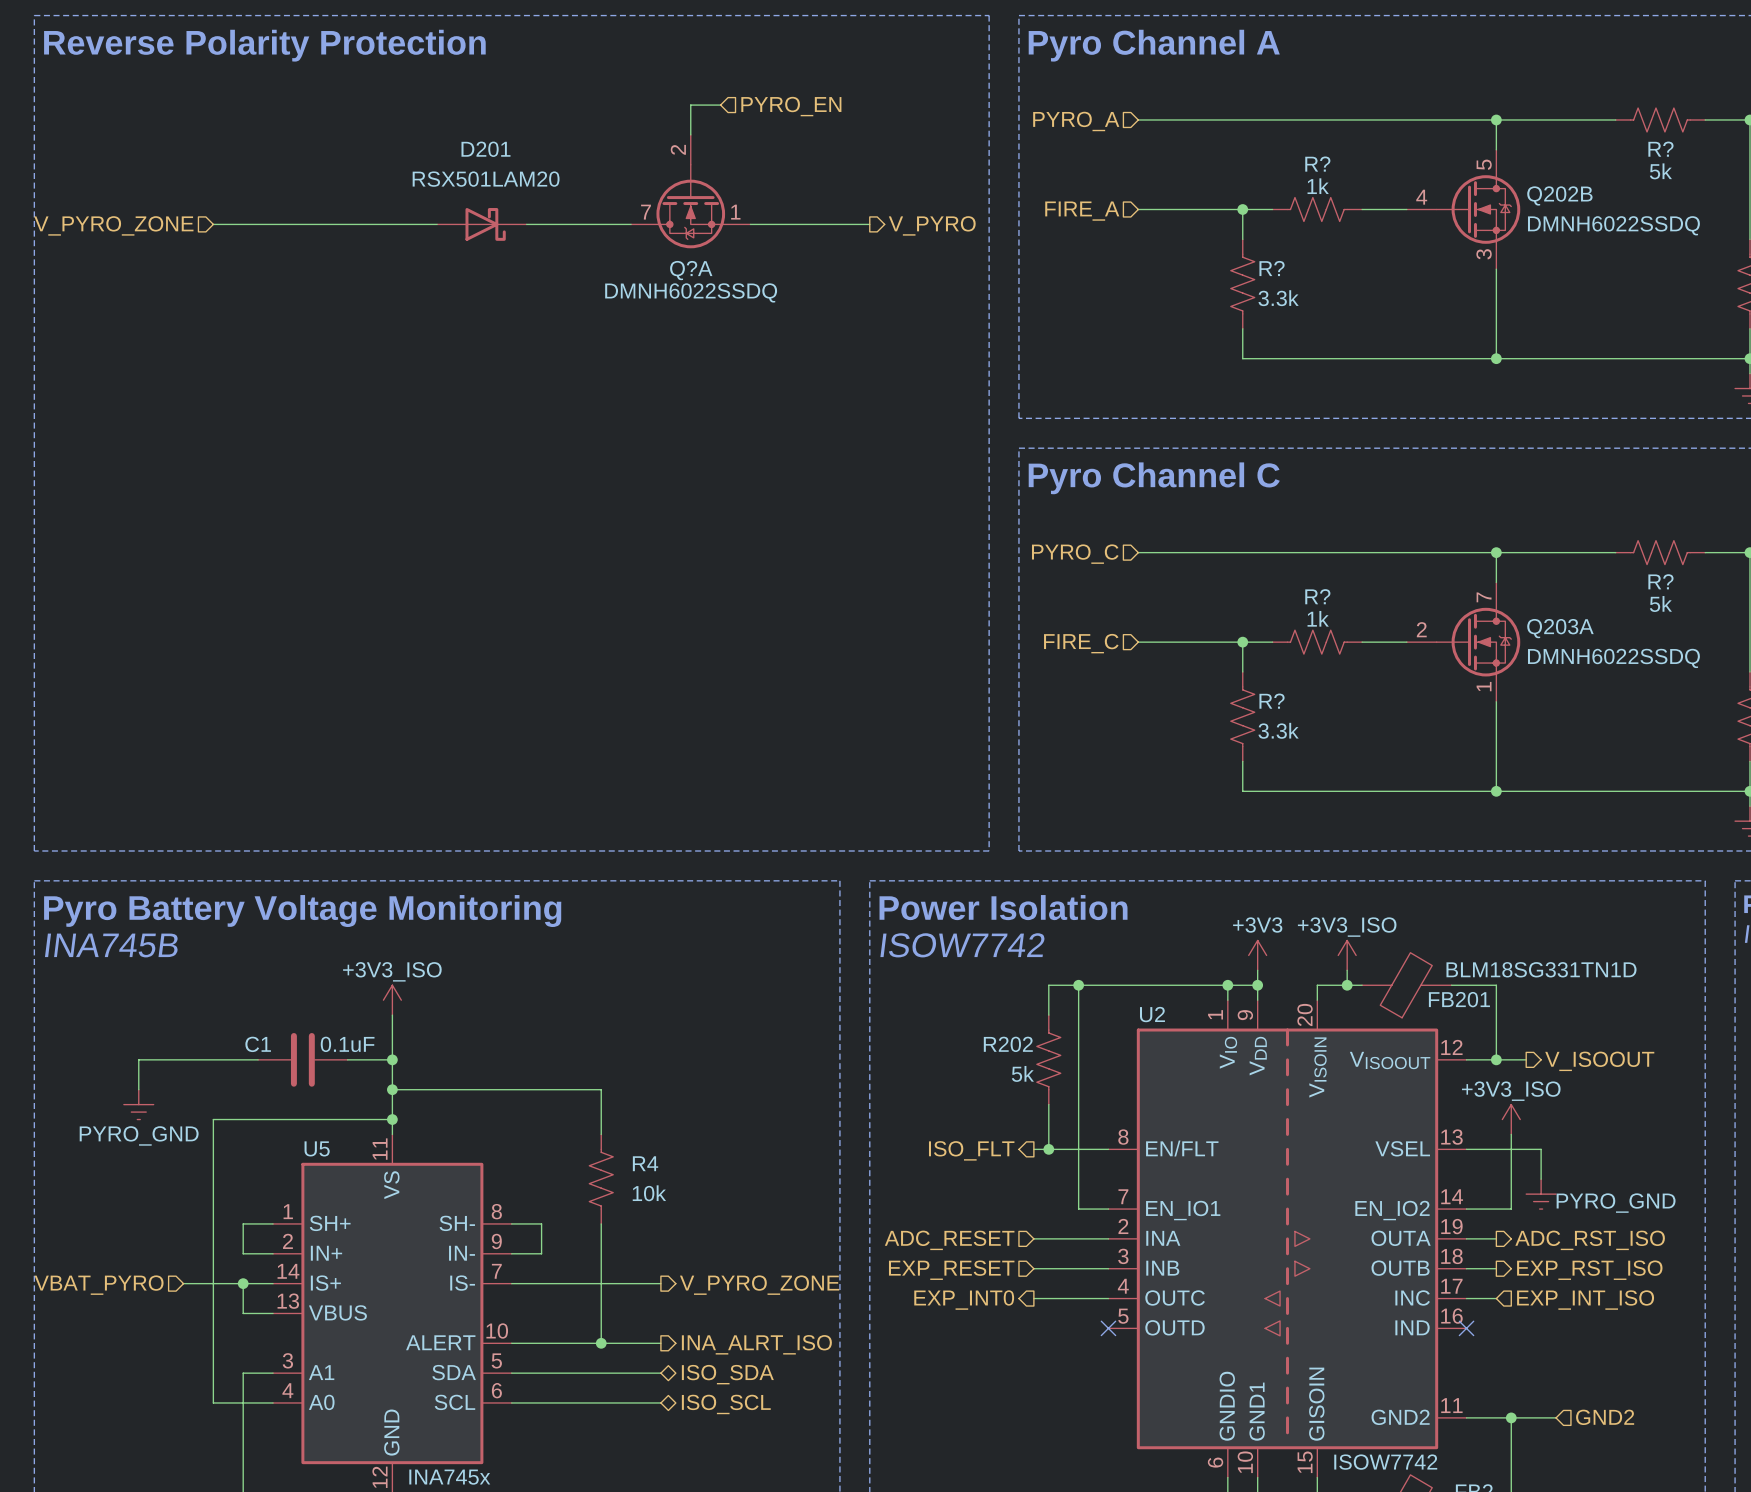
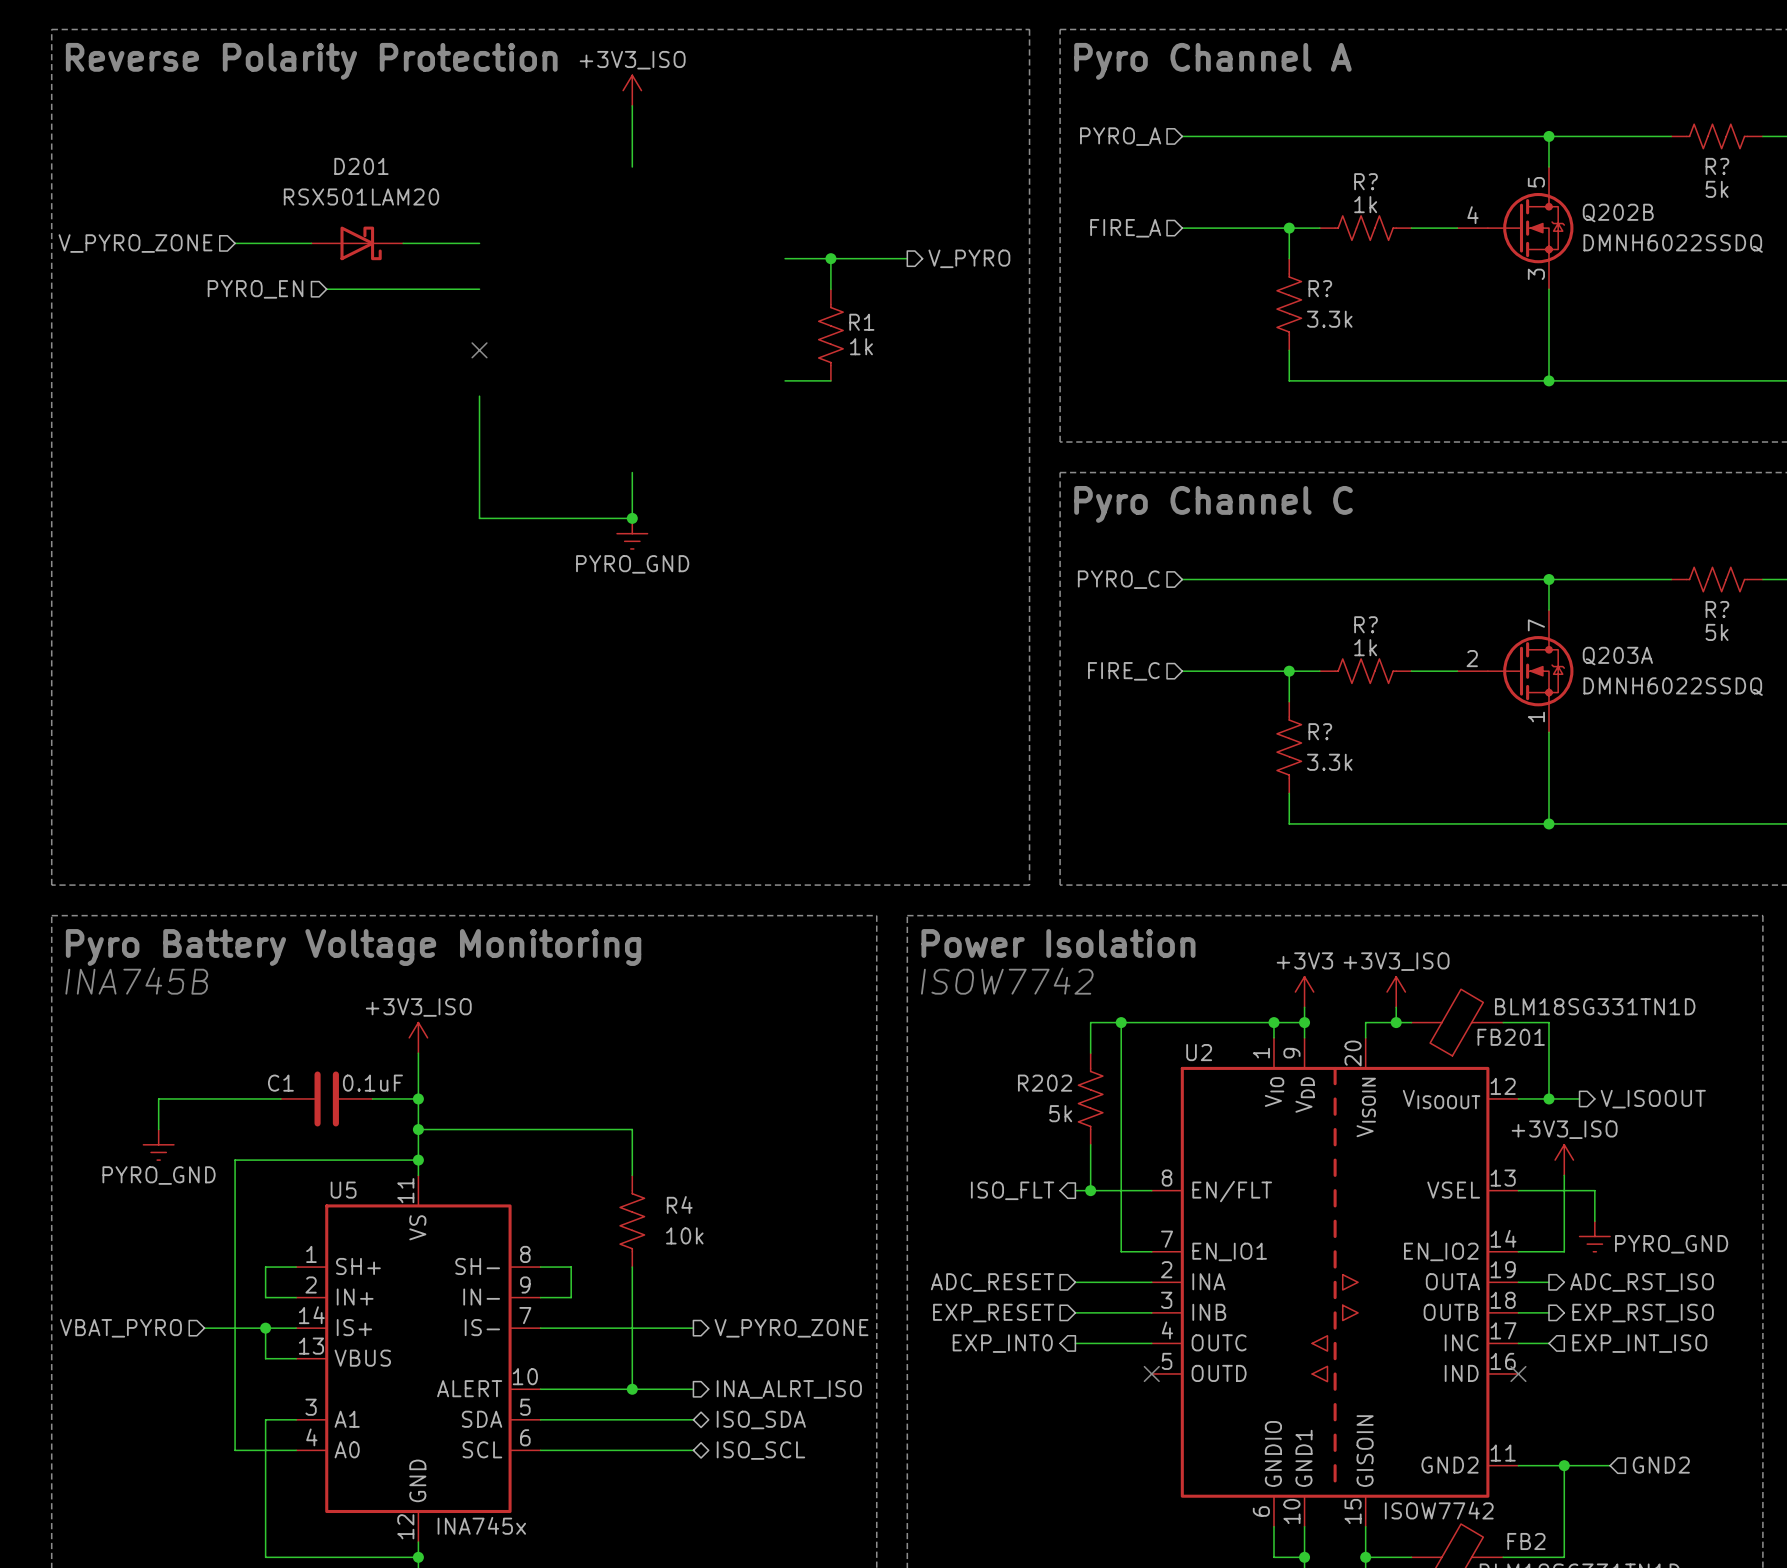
power symbol: none -> +3V3_ISO (632, 90)
wire: none -> (632, 105) (632, 167)
wire: (720, 105) (690, 105) (690, 134) -> none
hierarchical label: PYRO_EN (791, 106) -> none
Q?A: DMNH6022SSDQ (690, 191) -> none
D201 position: (481, 224) -> (357, 243)
wire: (526, 224) (631, 224) -> none
wire: (750, 224) (869, 224) -> (785, 258) (907, 258)
hierarchical label position: V_PYRO (932, 225) -> V_PYRO (969, 258)
wire: none -> (830, 258) (830, 289)
junction: none -> (830, 258)
wire: none -> (326, 289) (479, 289)
hierarchical label: none -> PYRO_EN (255, 289)
R1: none -> 1k (830, 335)
no-connect mark: none -> (479, 350)
wire: none -> (785, 380) (830, 380)
wire: none -> (479, 396) (479, 518) (632, 518) (632, 472)
junction: none -> (632, 518)
power symbol: none -> PYRO_GND (632, 533)

